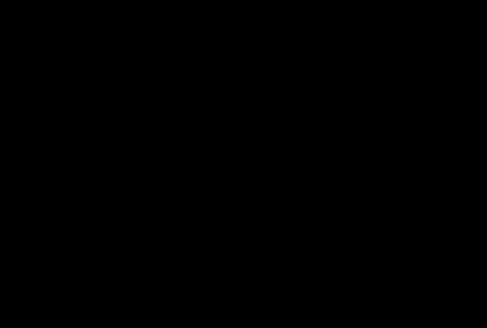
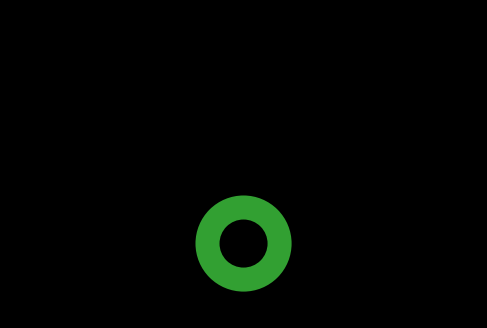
part: none -> (243, 243)

